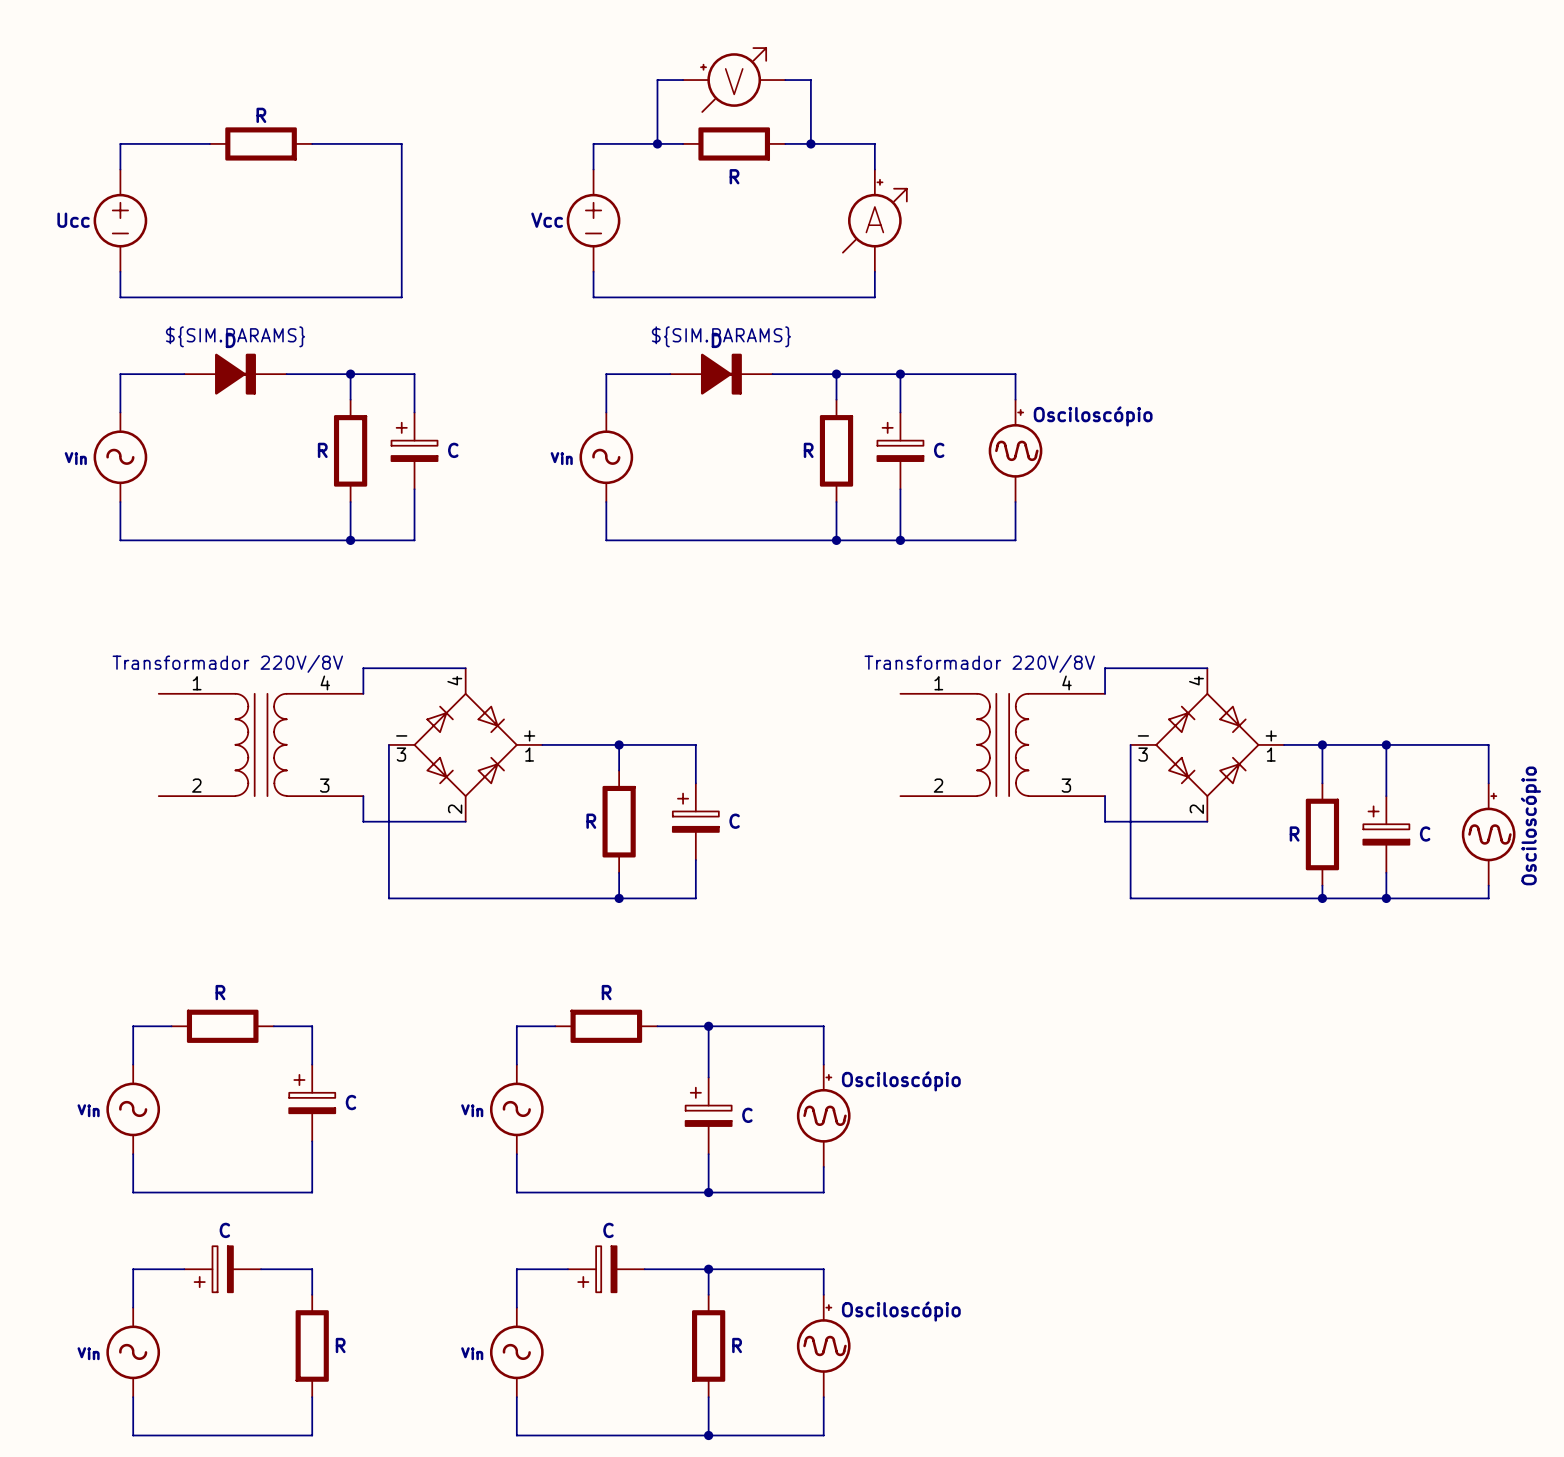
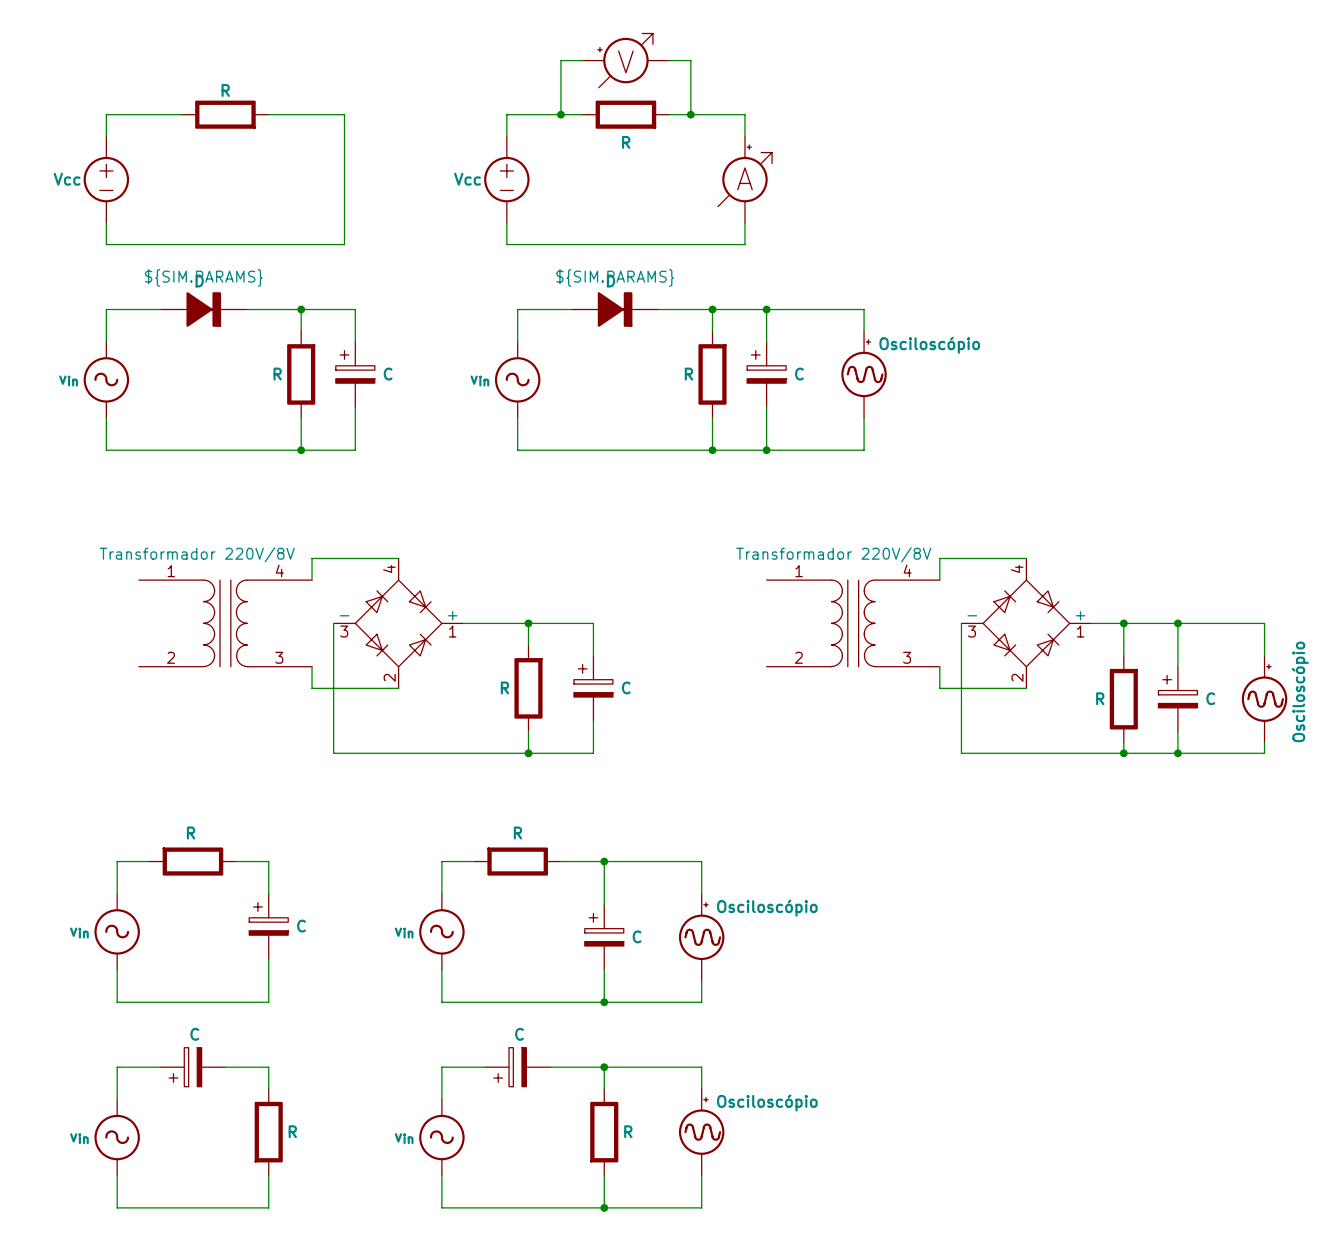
Ucc name: Ucc (73, 220) -> Vcc (67, 179)

